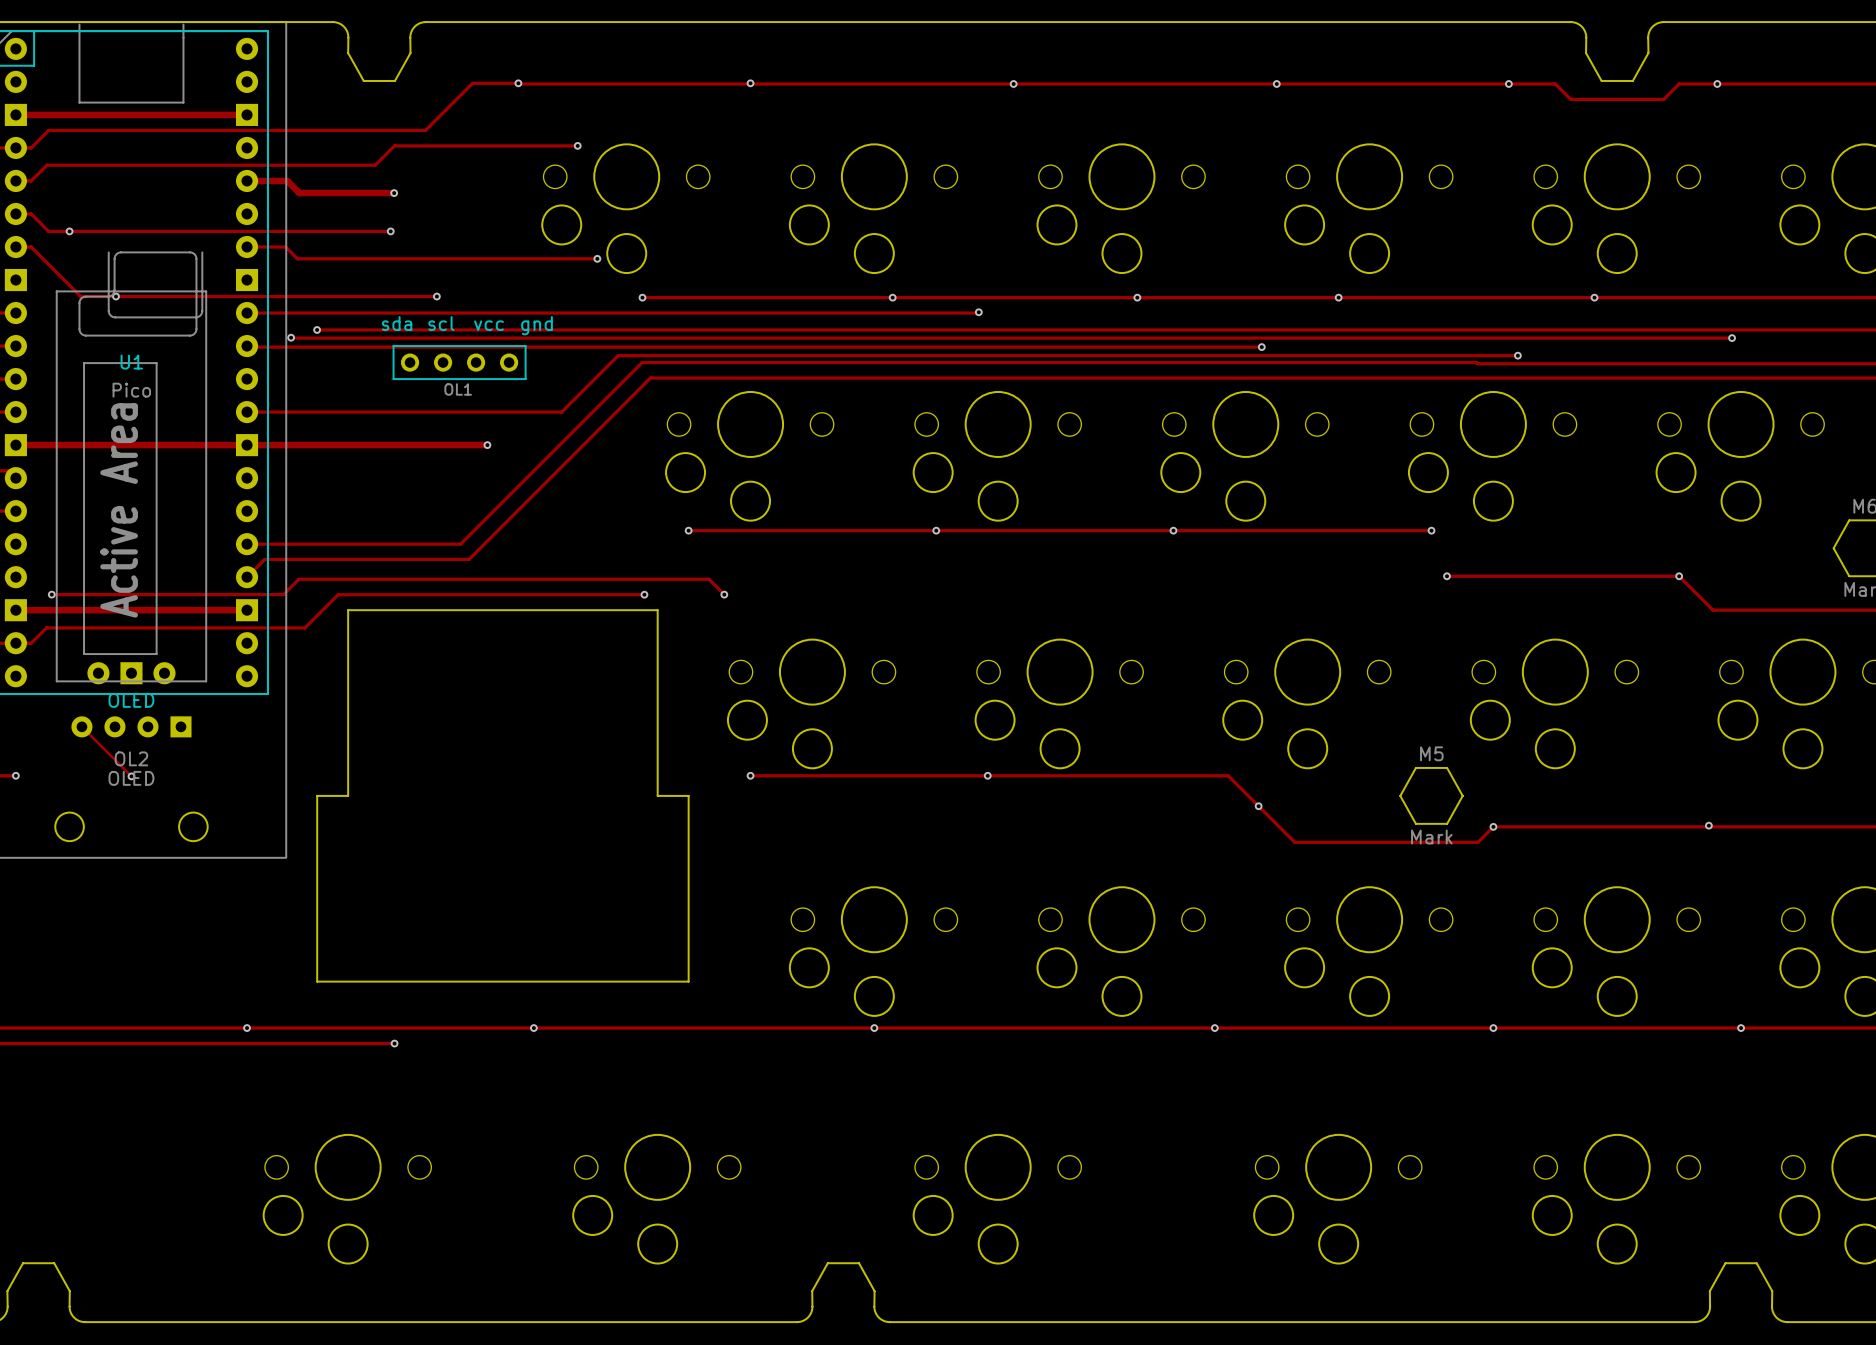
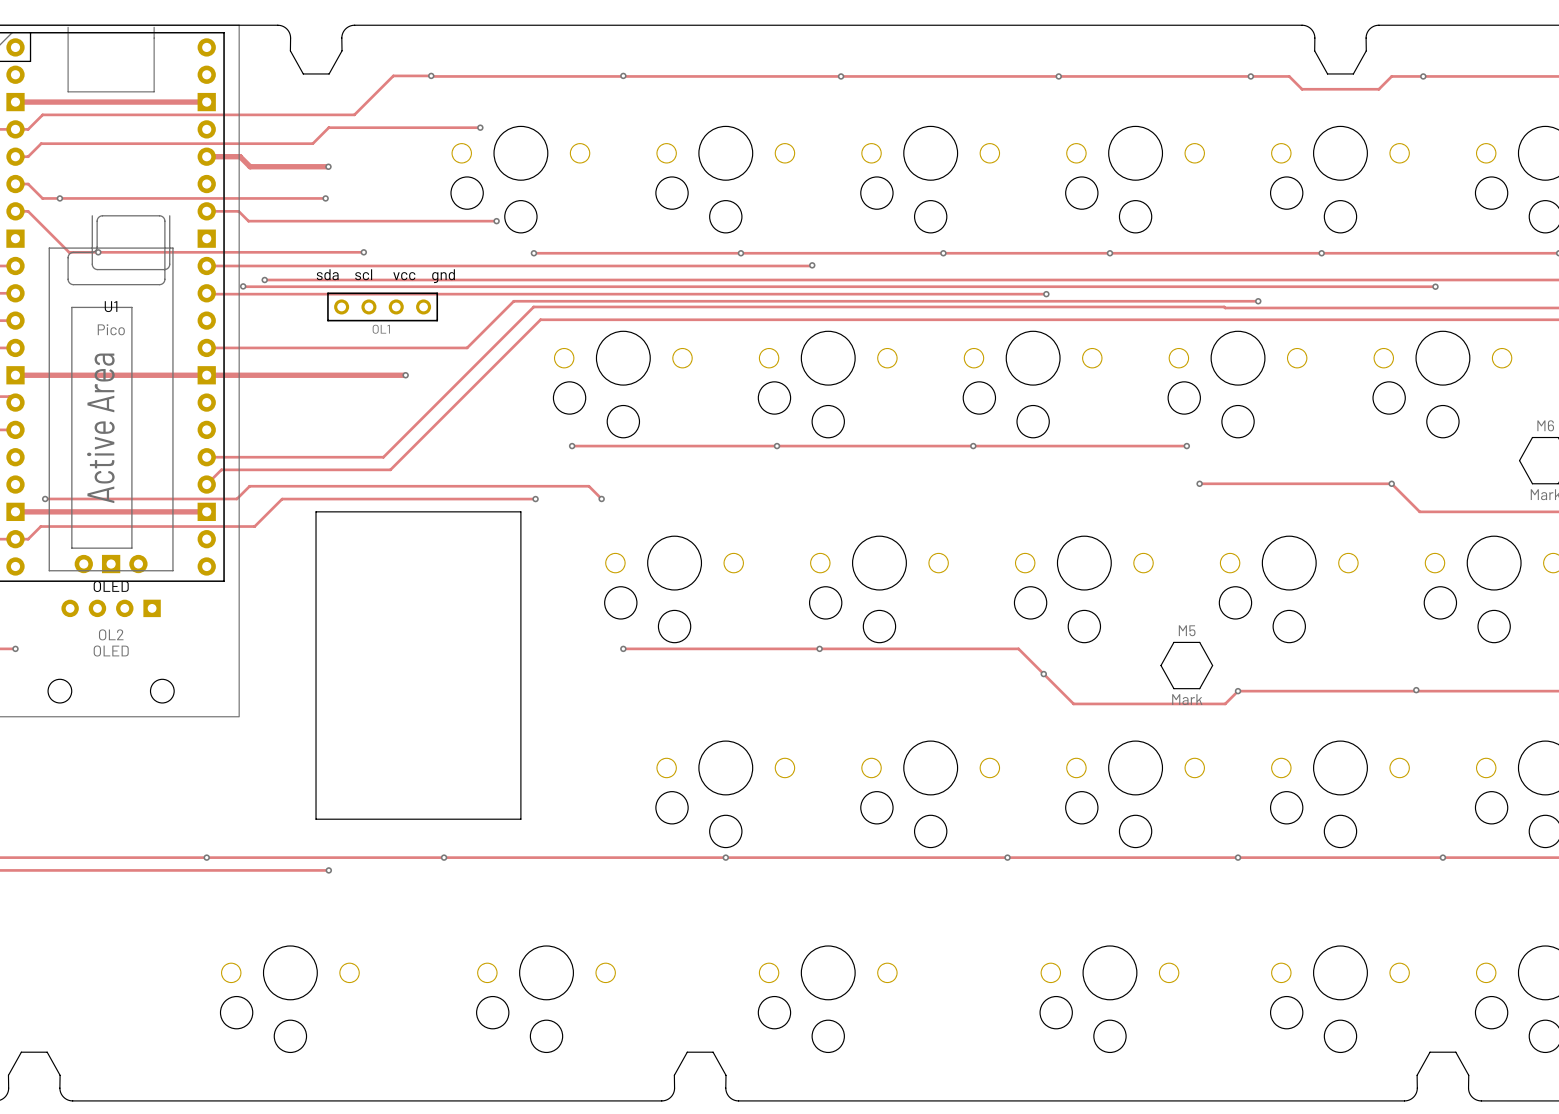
drawing: none -> [315, 511, 522, 820]
board edge: (348, 610) (348, 795) (317, 795) (317, 981) (688, 981) (688, 795) (657, 795) (657, 610) (348, 610) -> none
track: (81, 726) (131, 776) -> none
via: (131, 776) -> none

